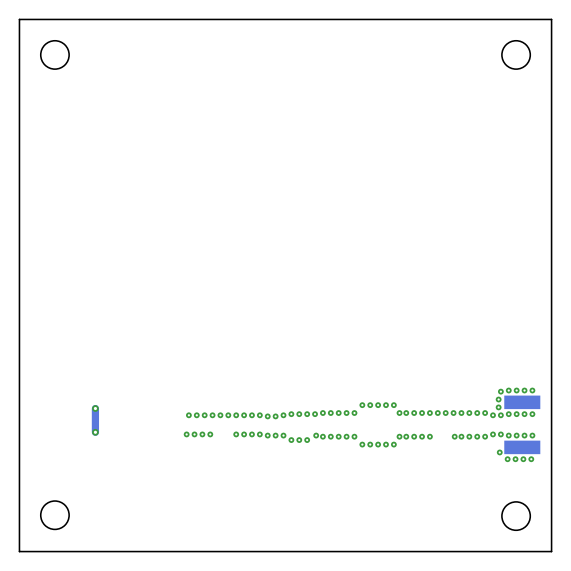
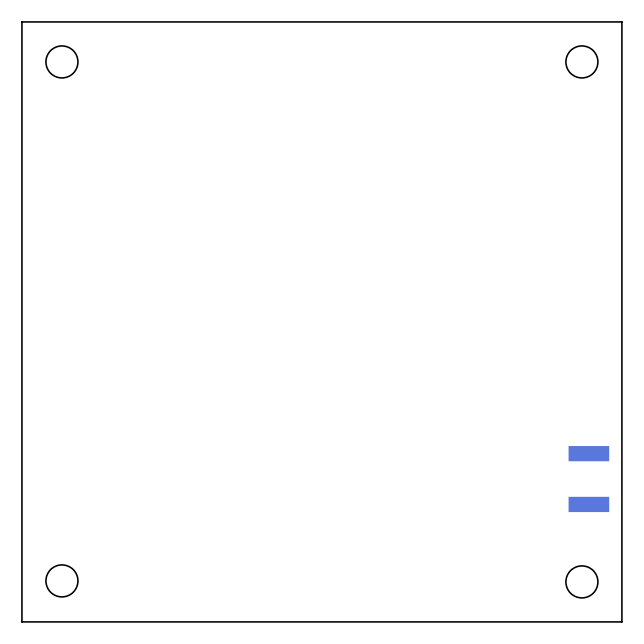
via: (508, 390) -> none
via: (516, 390) -> none
via: (524, 390) -> none
via: (532, 390) -> none
via: (500, 391) -> none
via: (498, 399) -> none
via: (362, 405) -> none
via: (370, 405) -> none
via: (378, 405) -> none
via: (386, 405) -> none
via: (393, 405) -> none
via: (498, 407) -> none
track: (95, 408) (95, 432) -> none
via: (95, 408) -> none
via: (322, 413) -> none
via: (330, 413) -> none
via: (338, 413) -> none
via: (346, 413) -> none
via: (354, 413) -> none
via: (399, 413) -> none
via: (406, 413) -> none
via: (414, 413) -> none
via: (422, 413) -> none
via: (429, 413) -> none
via: (437, 413) -> none
via: (445, 413) -> none
via: (453, 413) -> none
via: (461, 413) -> none
via: (469, 413) -> none
via: (477, 413) -> none
via: (485, 413) -> none
via: (291, 414) -> none
via: (299, 414) -> none
via: (307, 414) -> none
via: (315, 414) -> none
via: (508, 414) -> none
via: (516, 414) -> none
via: (524, 414) -> none
via: (532, 414) -> none
via: (188, 415) -> none
via: (196, 415) -> none
via: (204, 415) -> none
via: (212, 415) -> none
via: (220, 415) -> none
via: (228, 415) -> none
via: (236, 415) -> none
via: (244, 415) -> none
via: (251, 415) -> none
via: (259, 415) -> none
via: (283, 415) -> none
via: (493, 415) -> none
via: (500, 415) -> none
via: (267, 416) -> none
via: (275, 416) -> none
via: (95, 432) -> none
via: (186, 434) -> none
via: (194, 434) -> none
via: (202, 434) -> none
via: (210, 434) -> none
via: (236, 434) -> none
via: (244, 434) -> none
via: (251, 434) -> none
via: (259, 434) -> none
via: (493, 434) -> none
via: (500, 434) -> none
via: (267, 435) -> none
via: (275, 435) -> none
via: (283, 435) -> none
via: (316, 435) -> none
via: (508, 435) -> none
via: (516, 435) -> none
via: (524, 435) -> none
via: (532, 435) -> none
via: (322, 436) -> none
via: (330, 436) -> none
via: (338, 436) -> none
via: (346, 436) -> none
via: (354, 436) -> none
via: (399, 436) -> none
via: (406, 436) -> none
via: (414, 436) -> none
via: (422, 436) -> none
via: (429, 436) -> none
via: (454, 436) -> none
via: (461, 436) -> none
via: (469, 436) -> none
via: (477, 436) -> none
via: (485, 436) -> none
via: (291, 440) -> none
via: (299, 440) -> none
via: (307, 440) -> none
via: (362, 444) -> none
via: (370, 444) -> none
via: (378, 444) -> none
via: (386, 444) -> none
via: (393, 444) -> none
via: (499, 452) -> none
via: (507, 459) -> none
via: (515, 459) -> none
via: (523, 459) -> none
via: (531, 459) -> none

